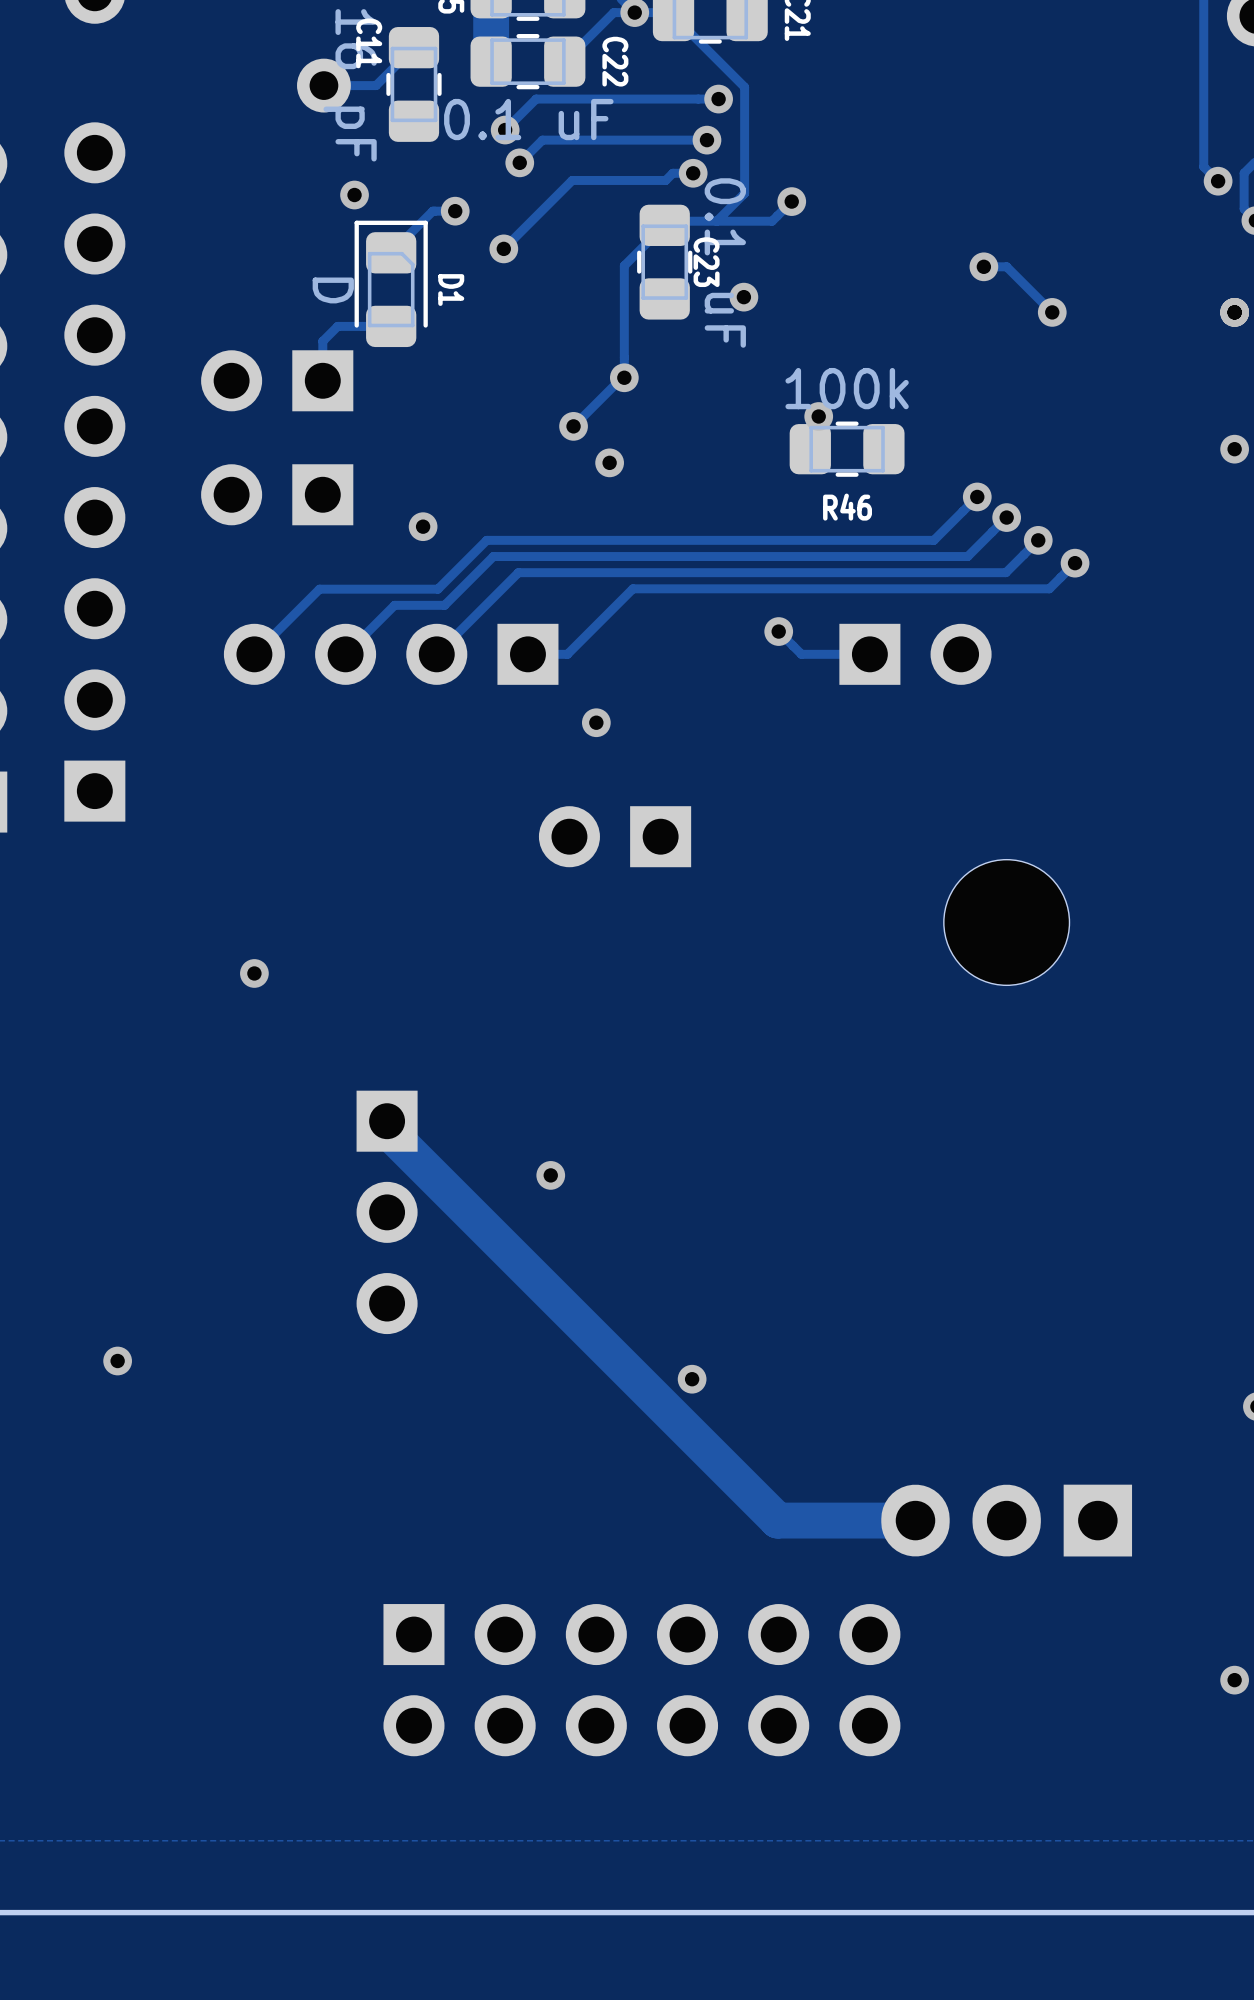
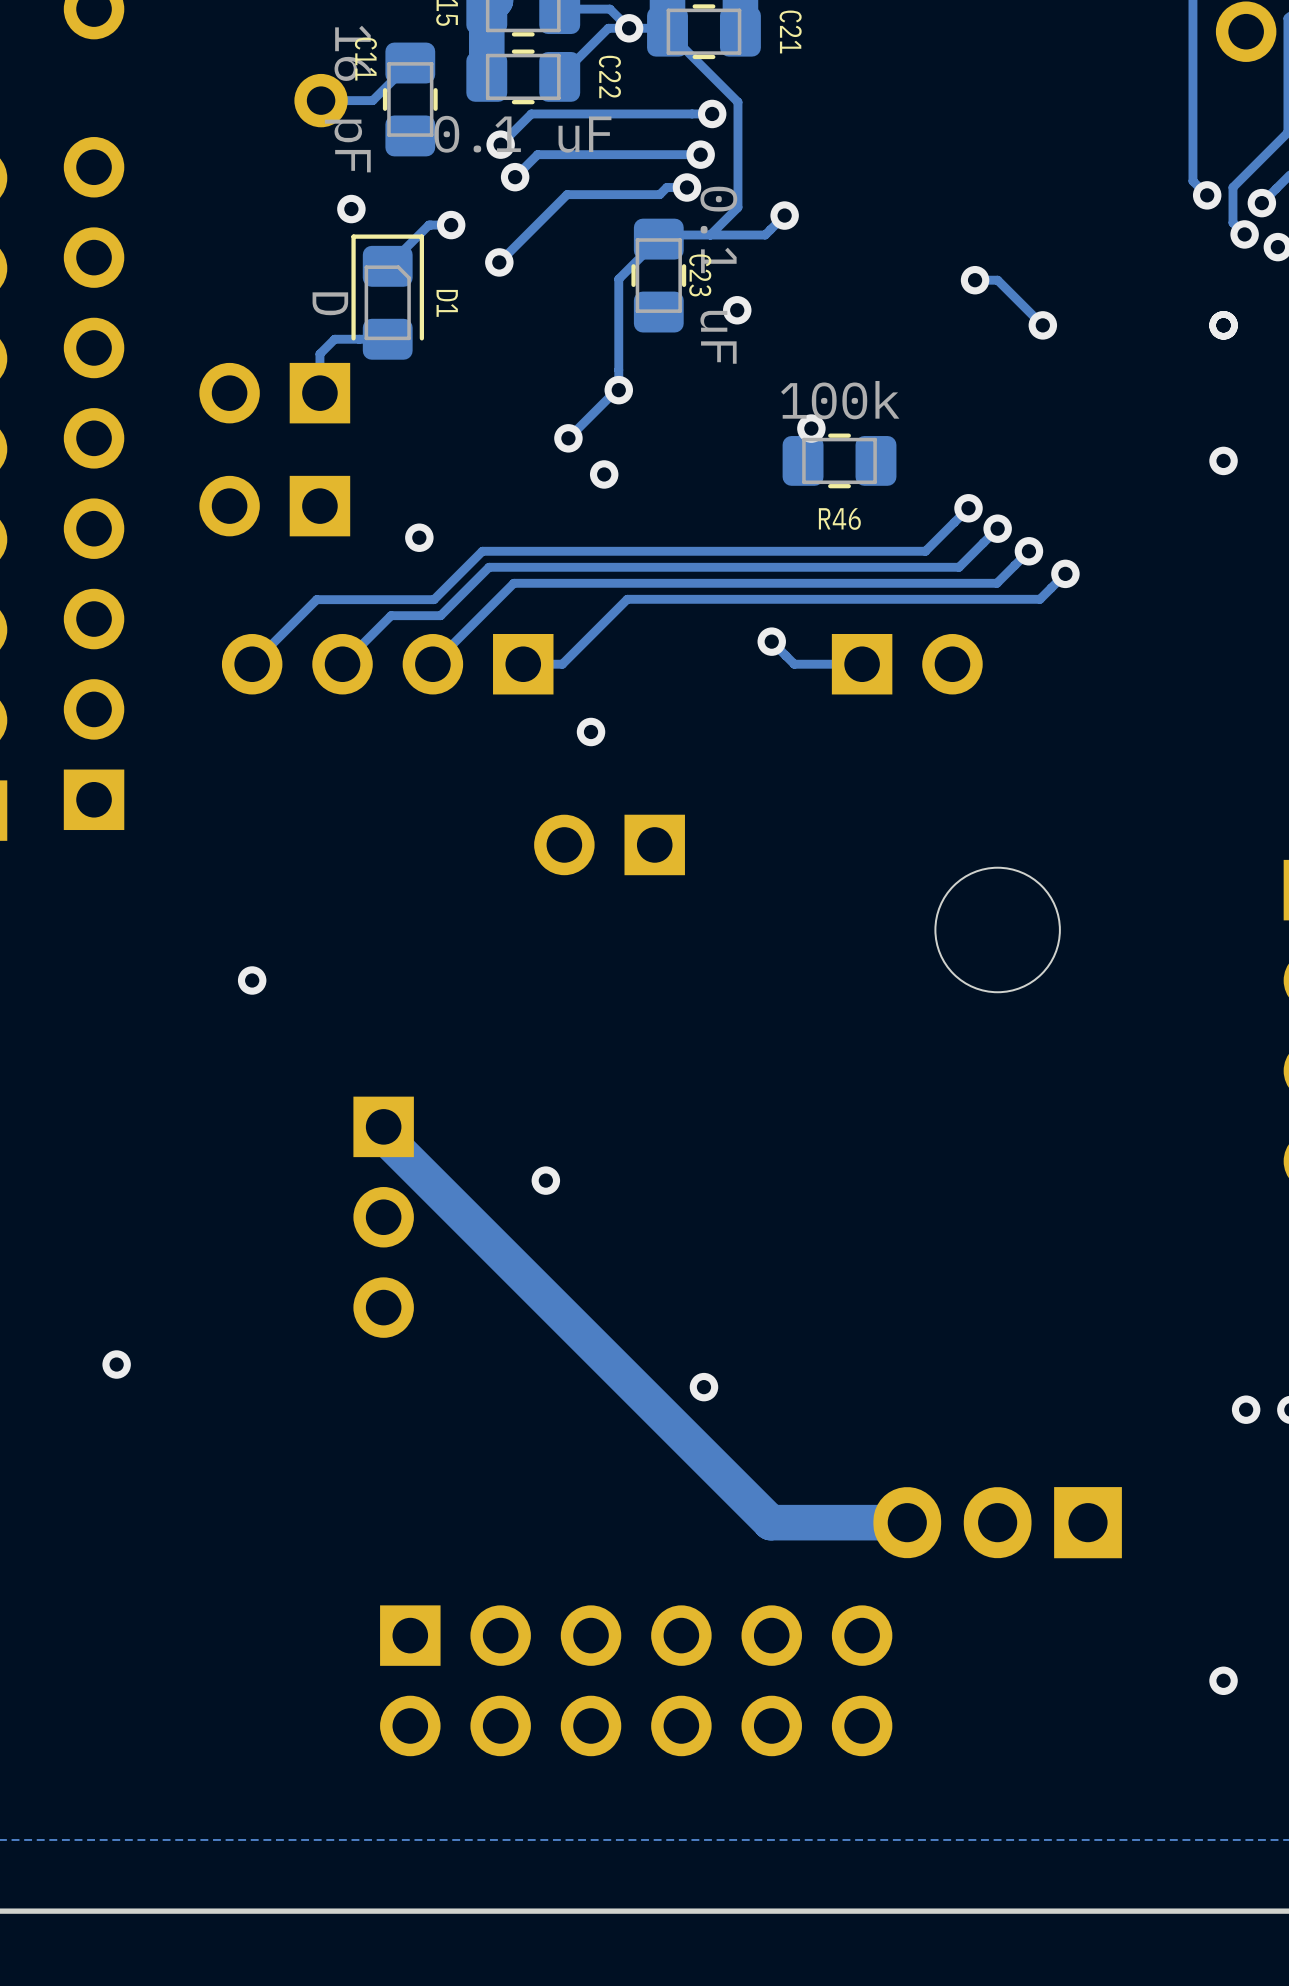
via position: (692, 1379) -> (703, 1387)

